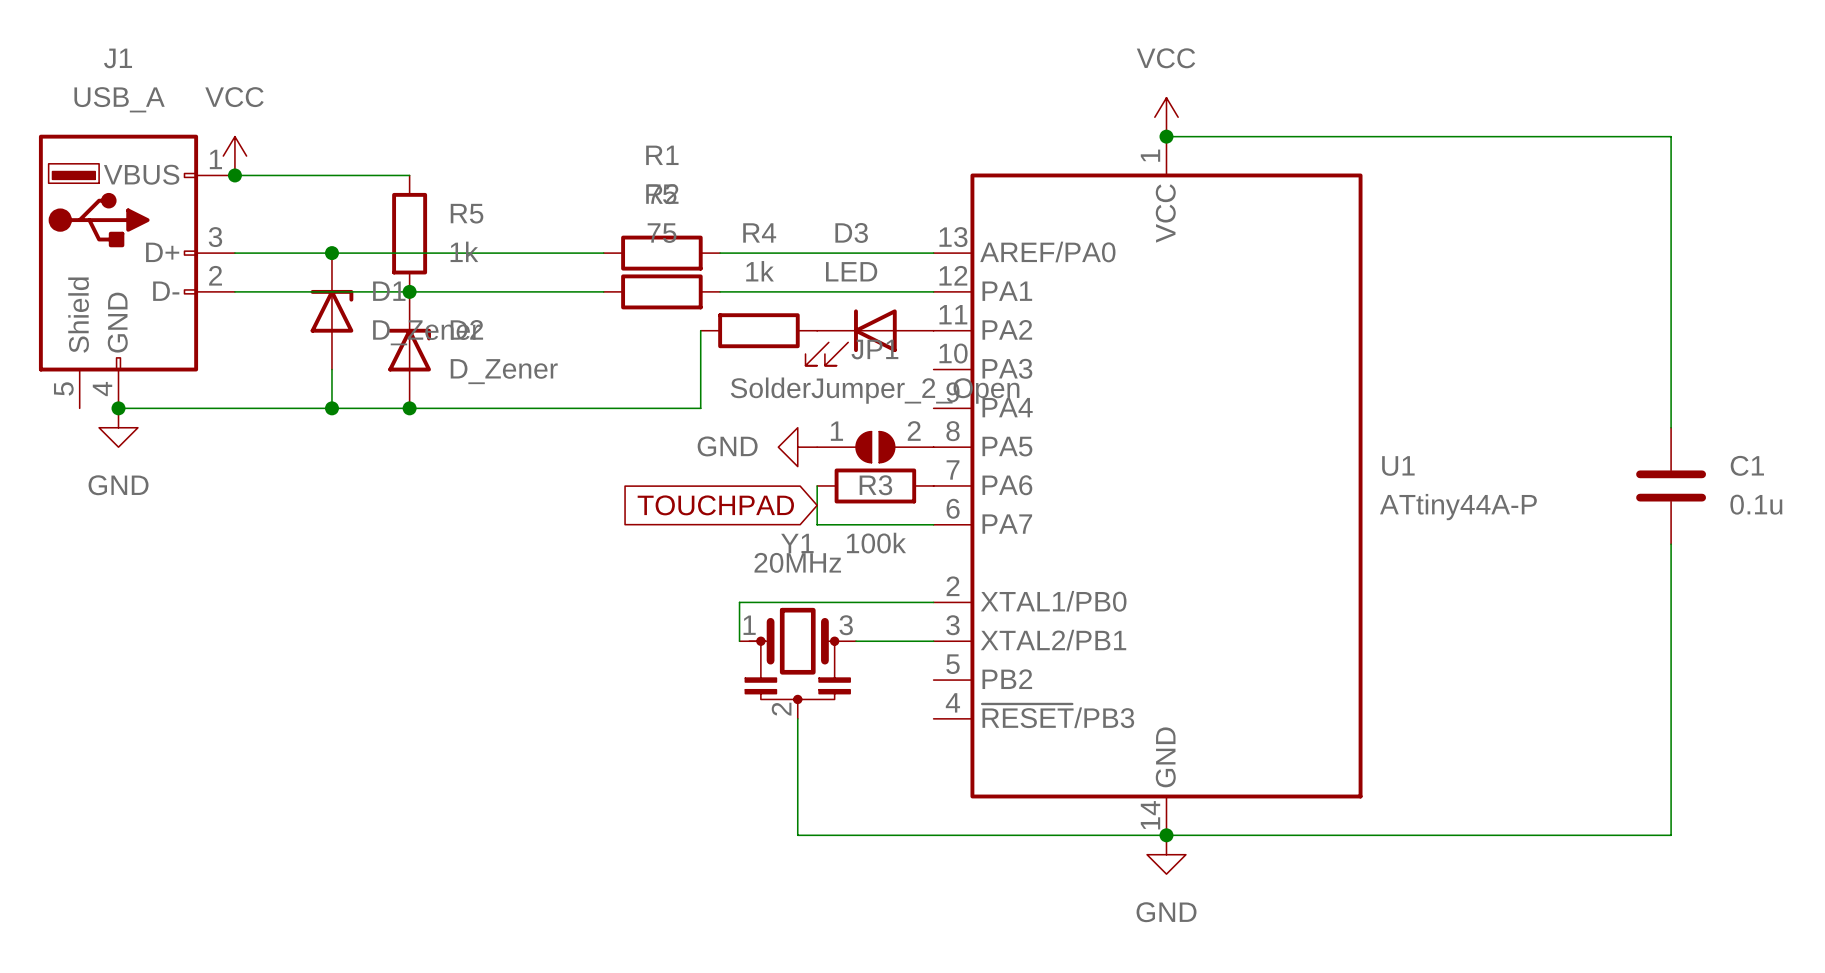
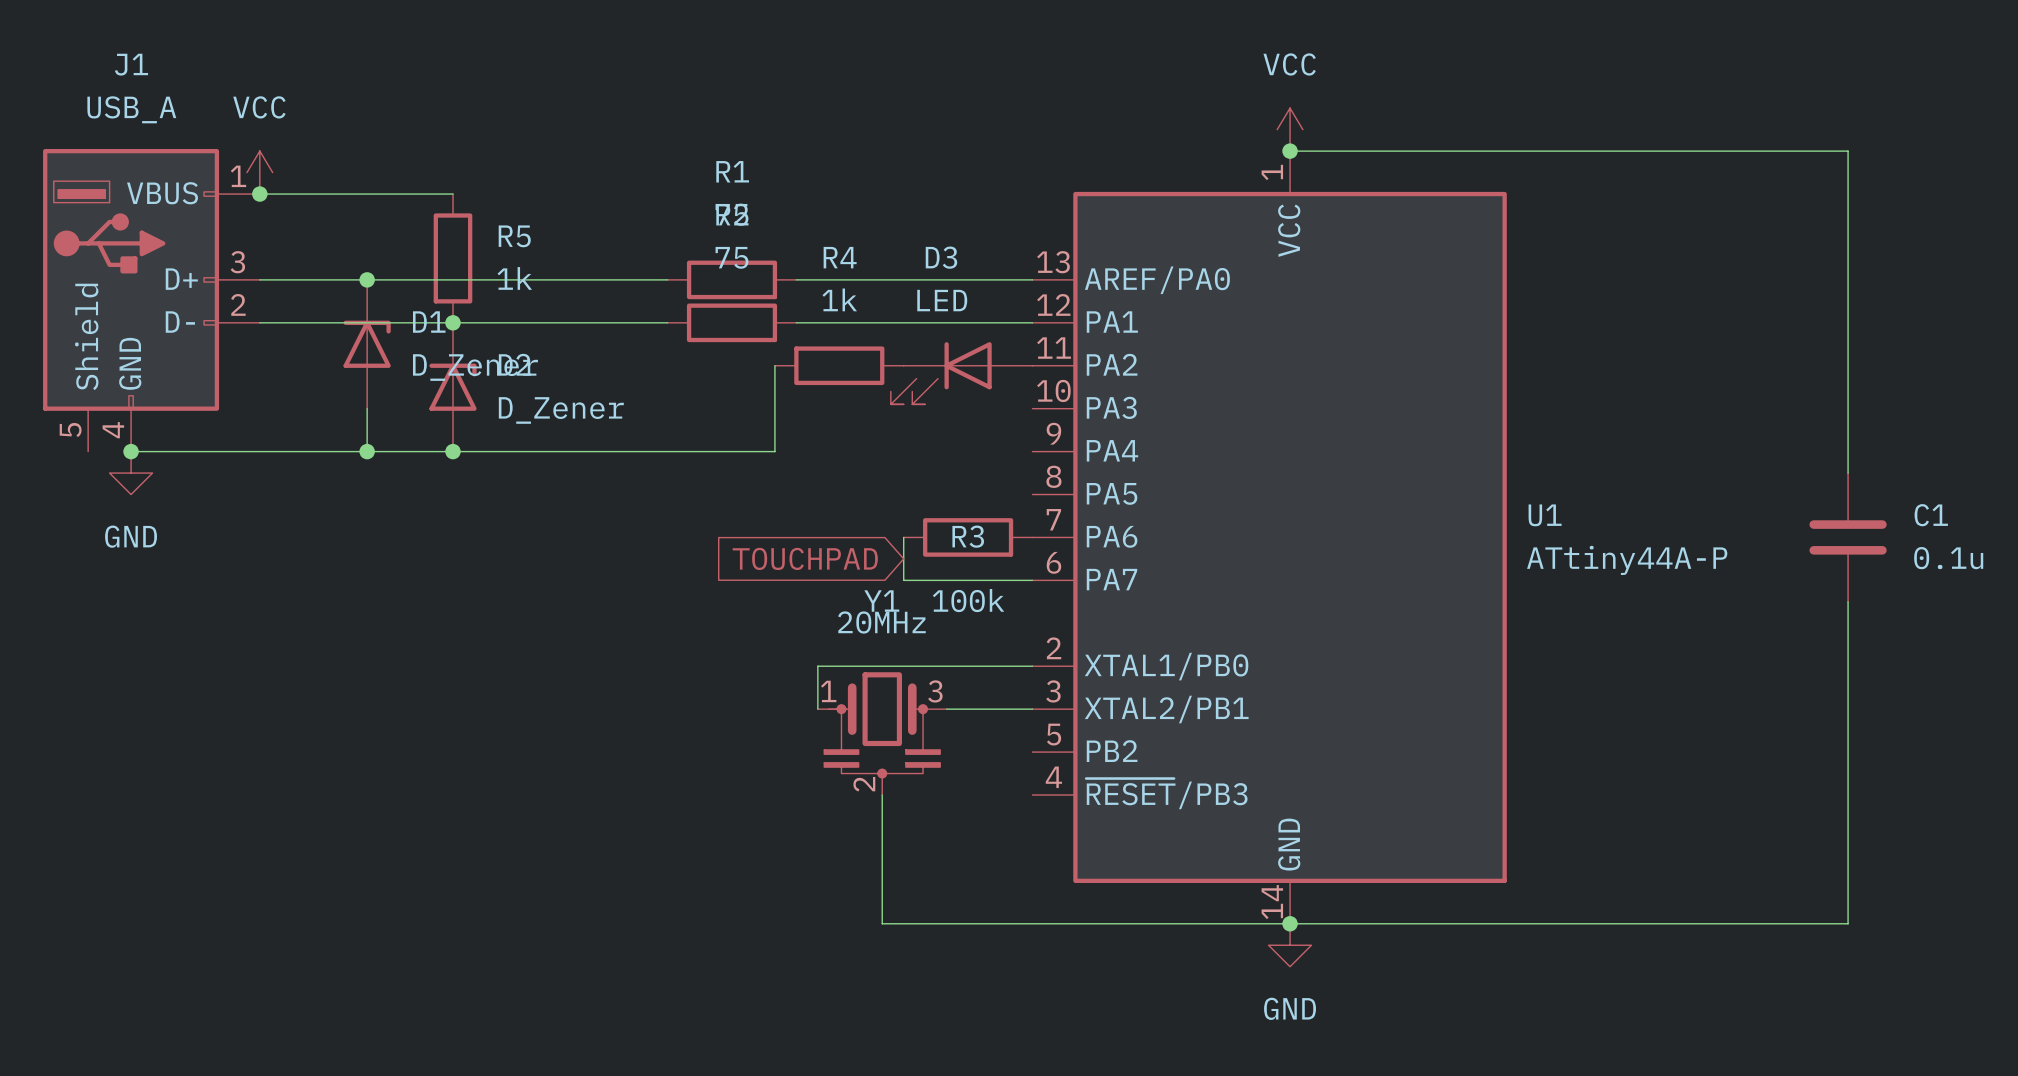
power symbol: GND (797, 447) -> none
JP1: SolderJumper_2_Open (875, 447) -> none

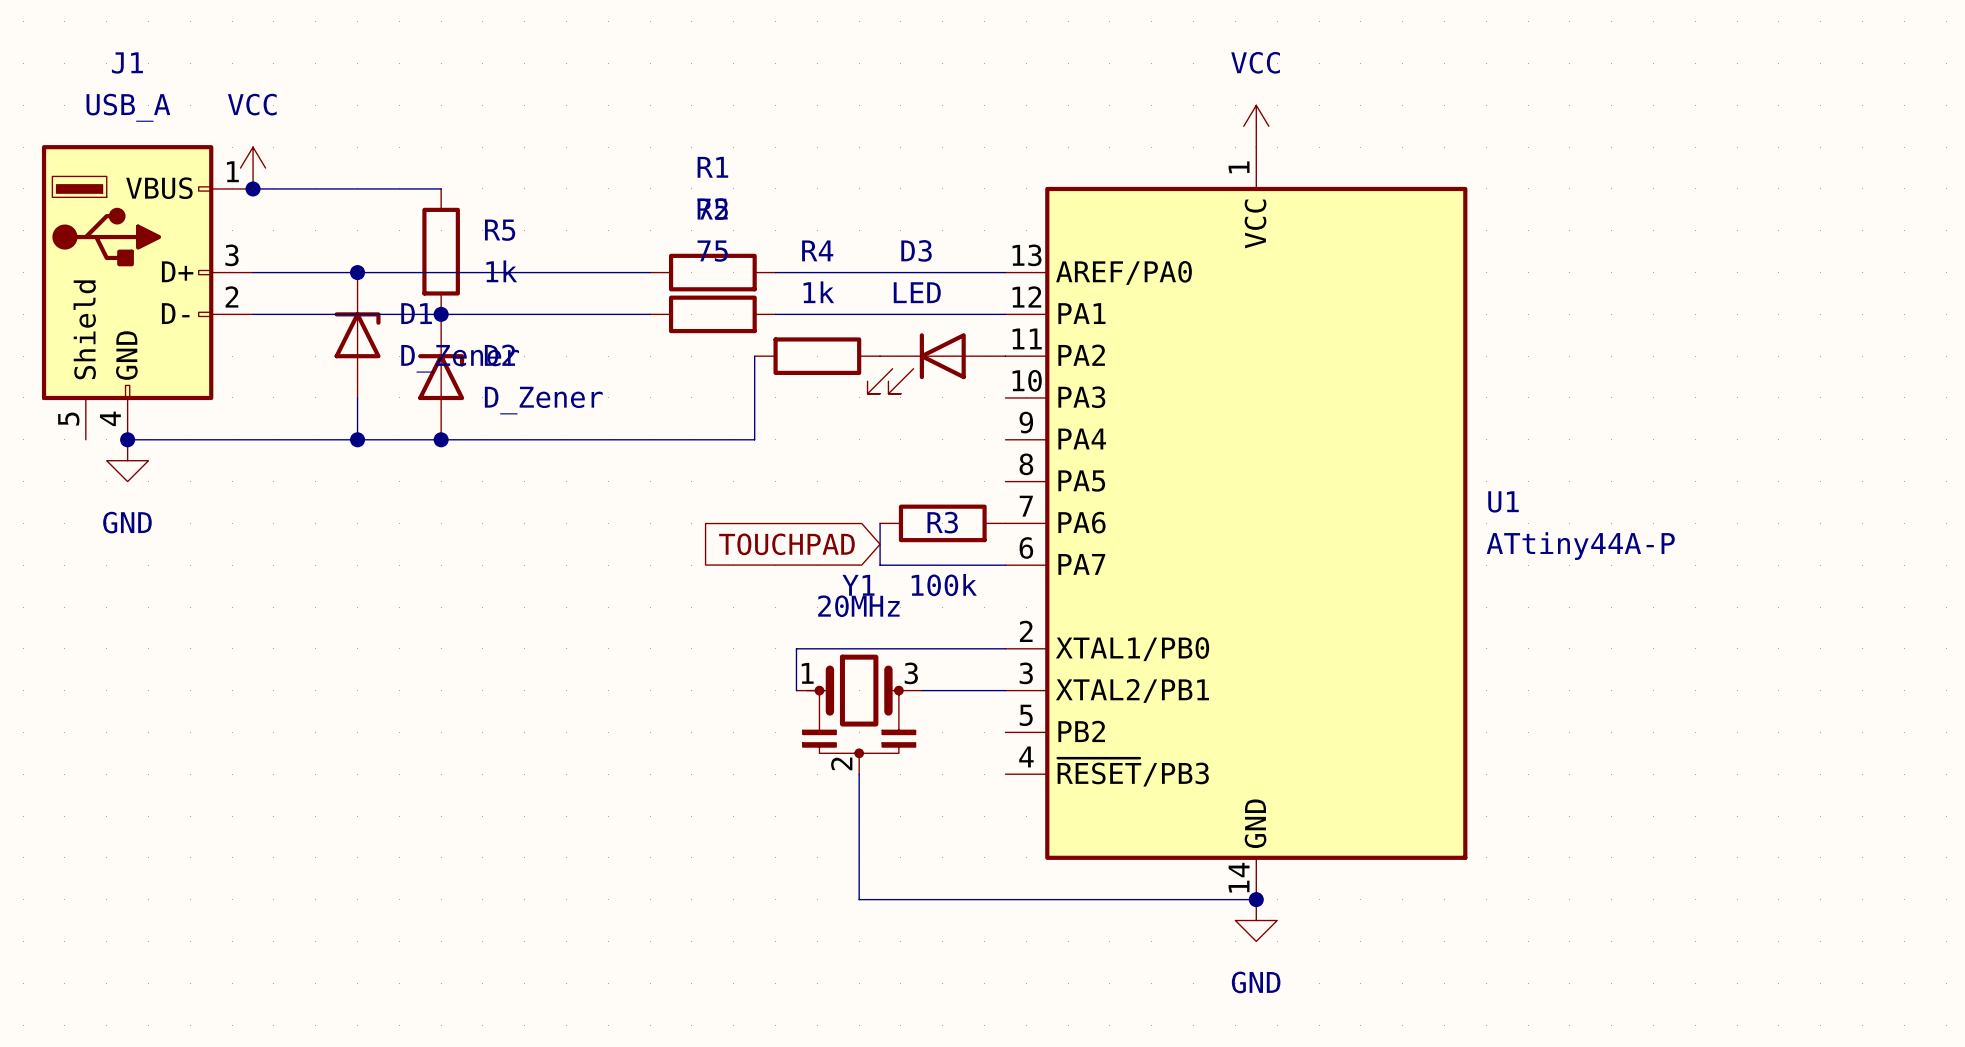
wire: (1290, 151) (1848, 151) (1848, 473) -> none
junction: (1290, 151) -> none
C1: 0.1u (1848, 537) -> none
wire: (1848, 601) (1848, 923) (1290, 923) -> none

